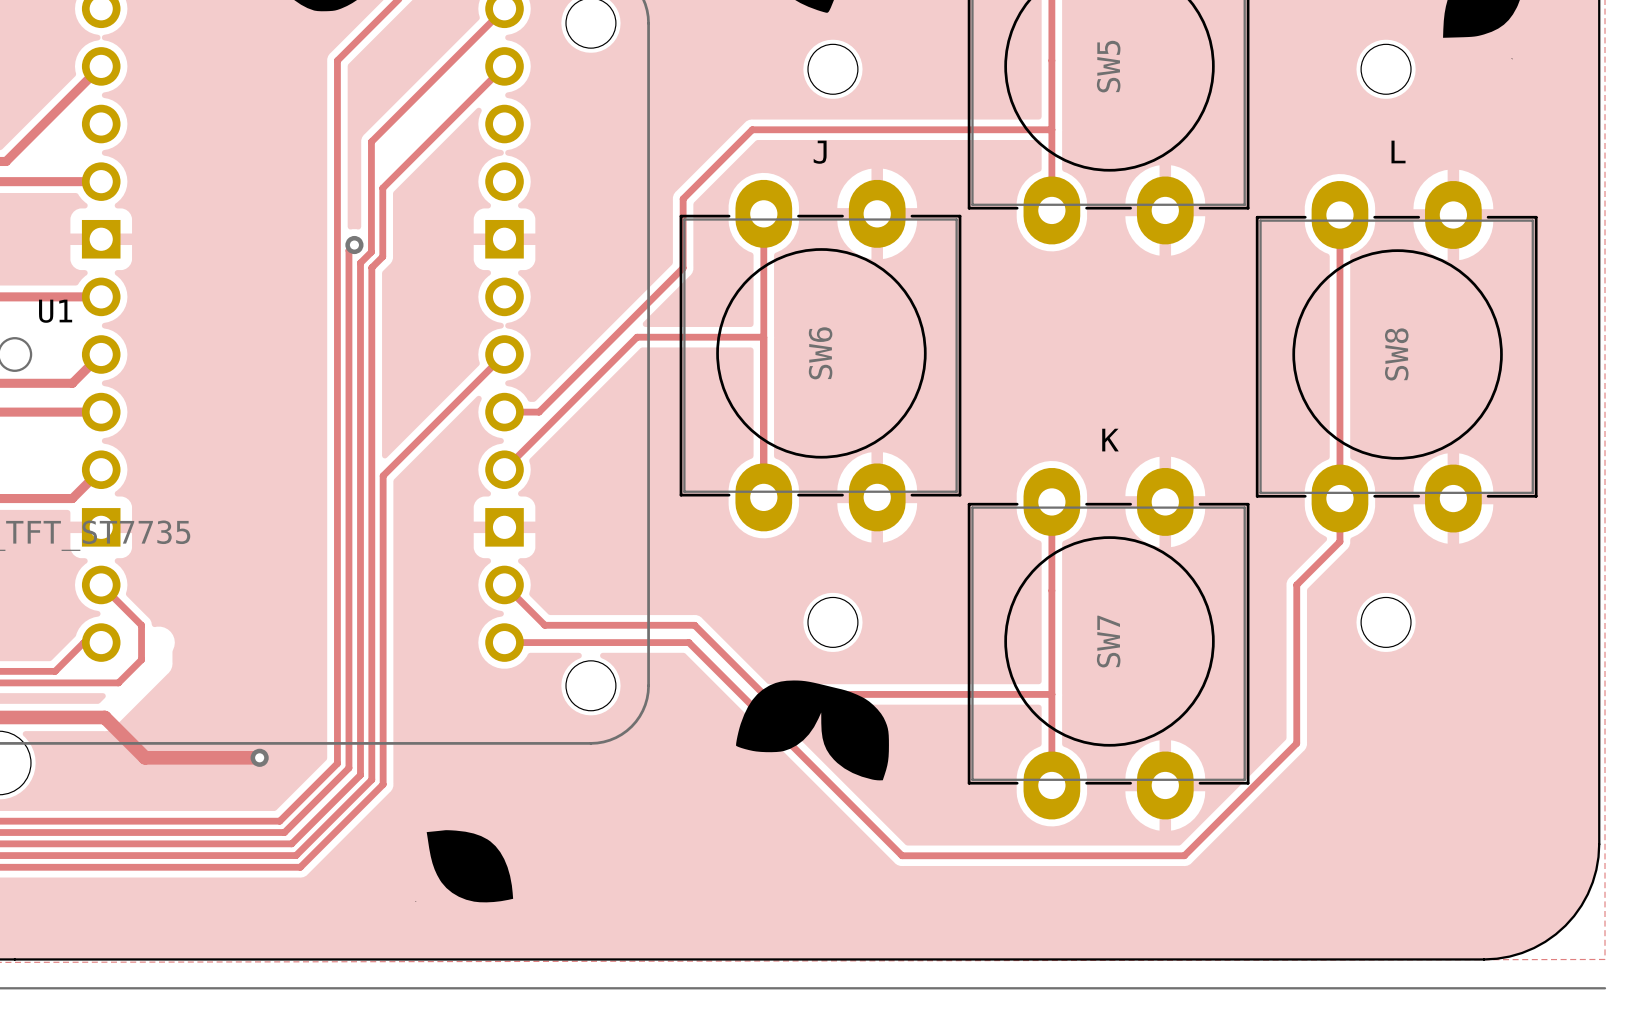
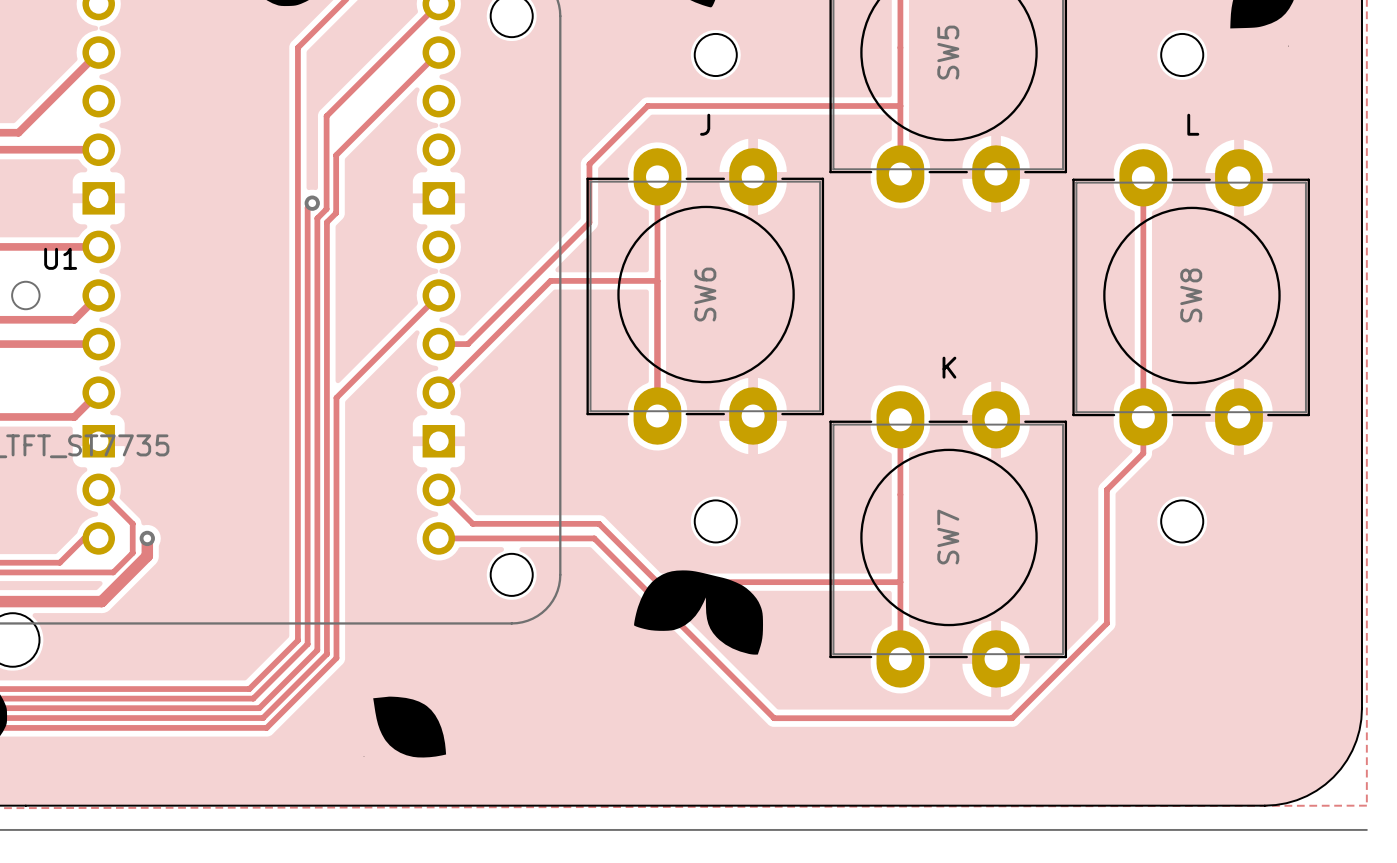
via: none -> (147, 538)
track: (104, 717) (145, 757) (259, 757) -> (101, 601) (147, 556) (147, 538)
via: (259, 757) -> none

